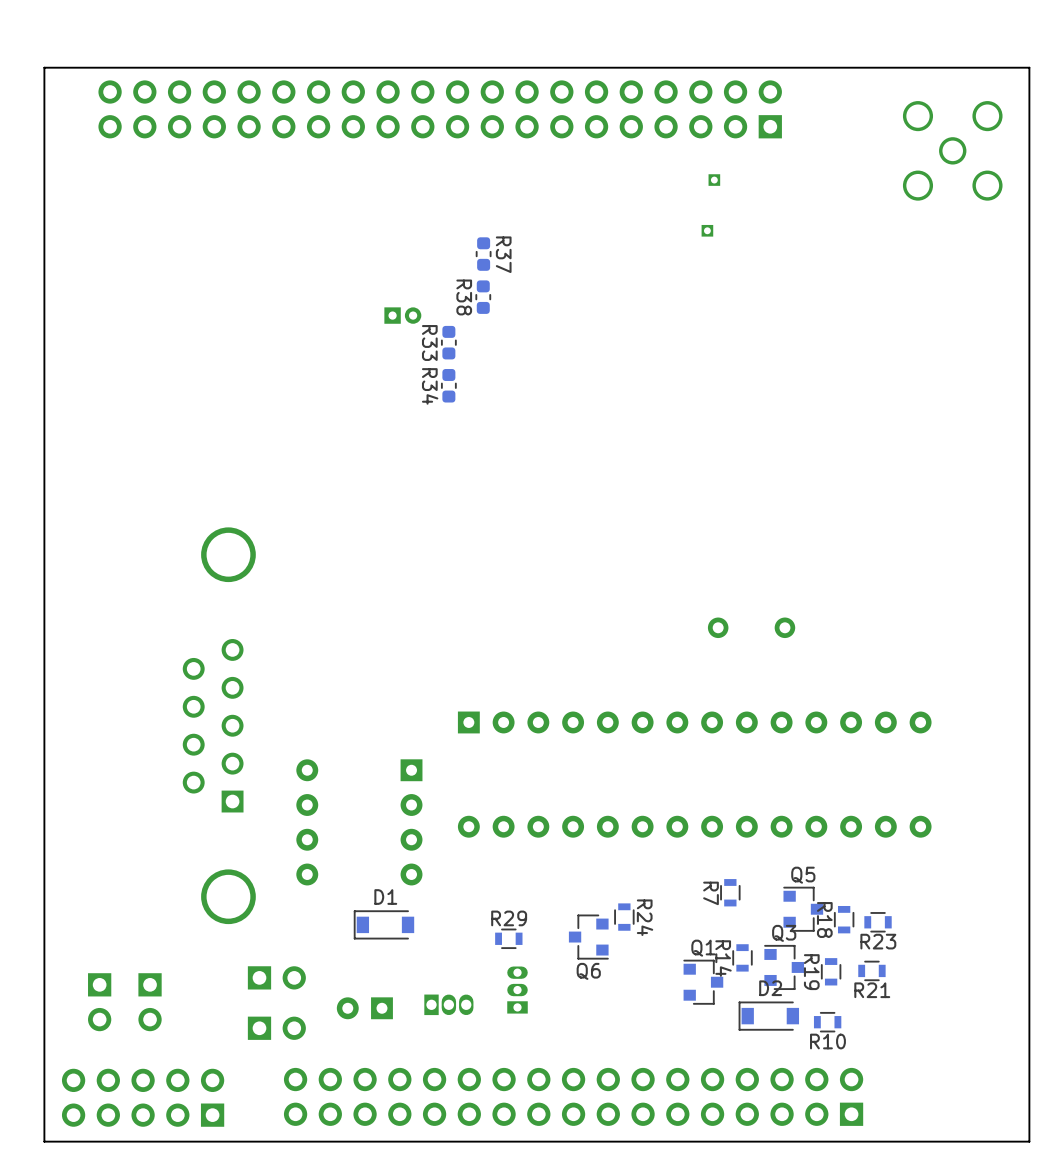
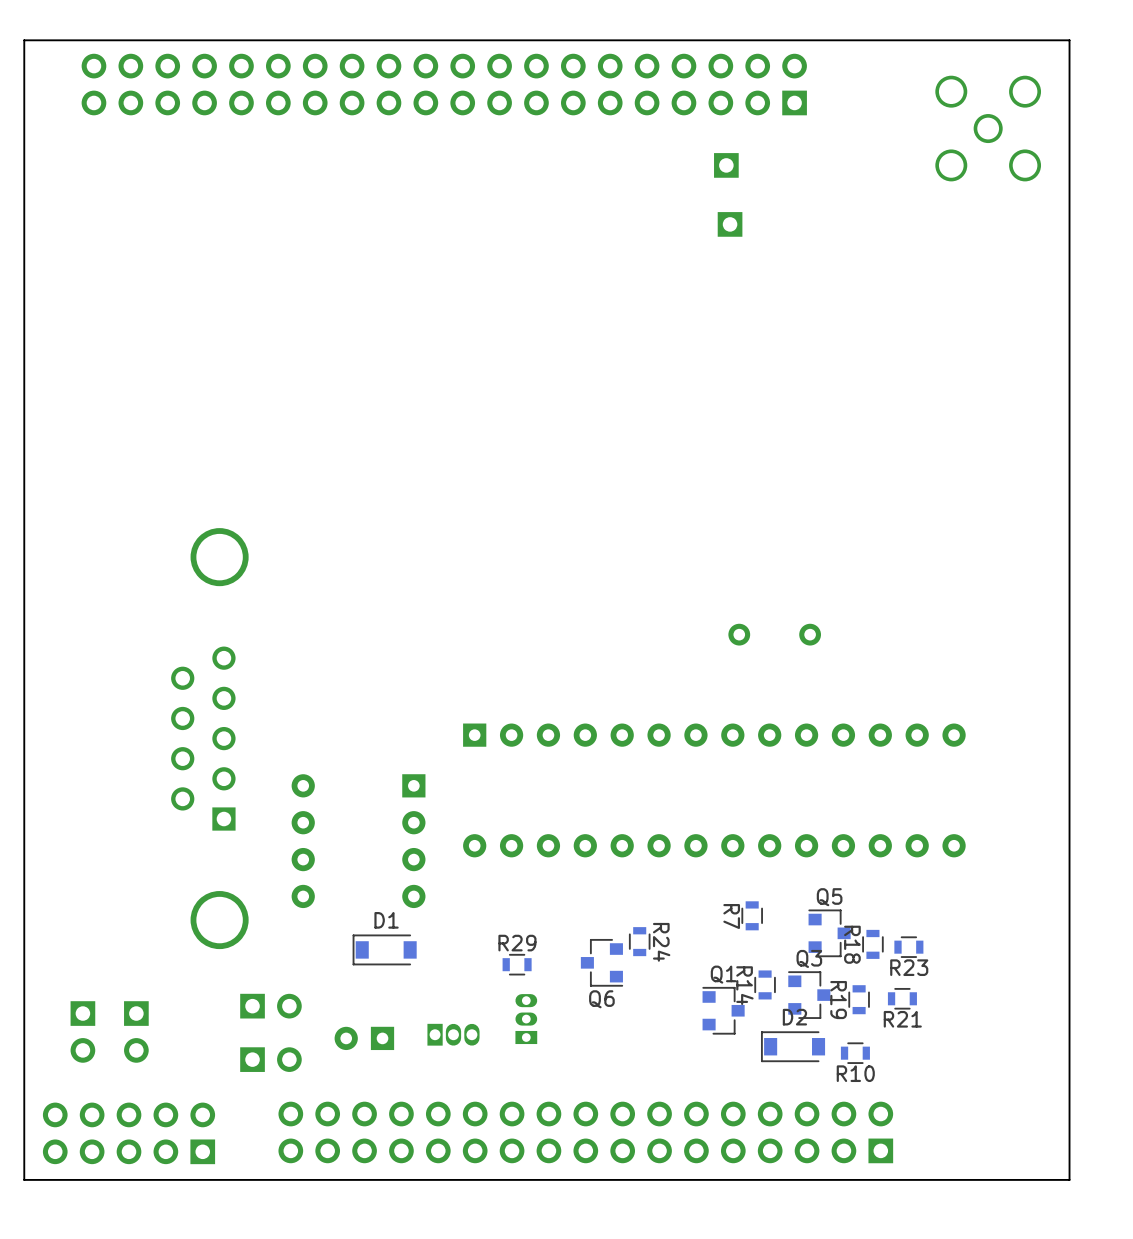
part footprint: [708, 174, 721, 186] -> [714, 153, 739, 178]
part footprint: [701, 224, 714, 237] -> [717, 212, 743, 237]
R37: (483, 254) -> none
R38: (483, 297) -> none
part: (402, 315) -> none
R33: (448, 342) -> none
R34: (448, 385) -> none

